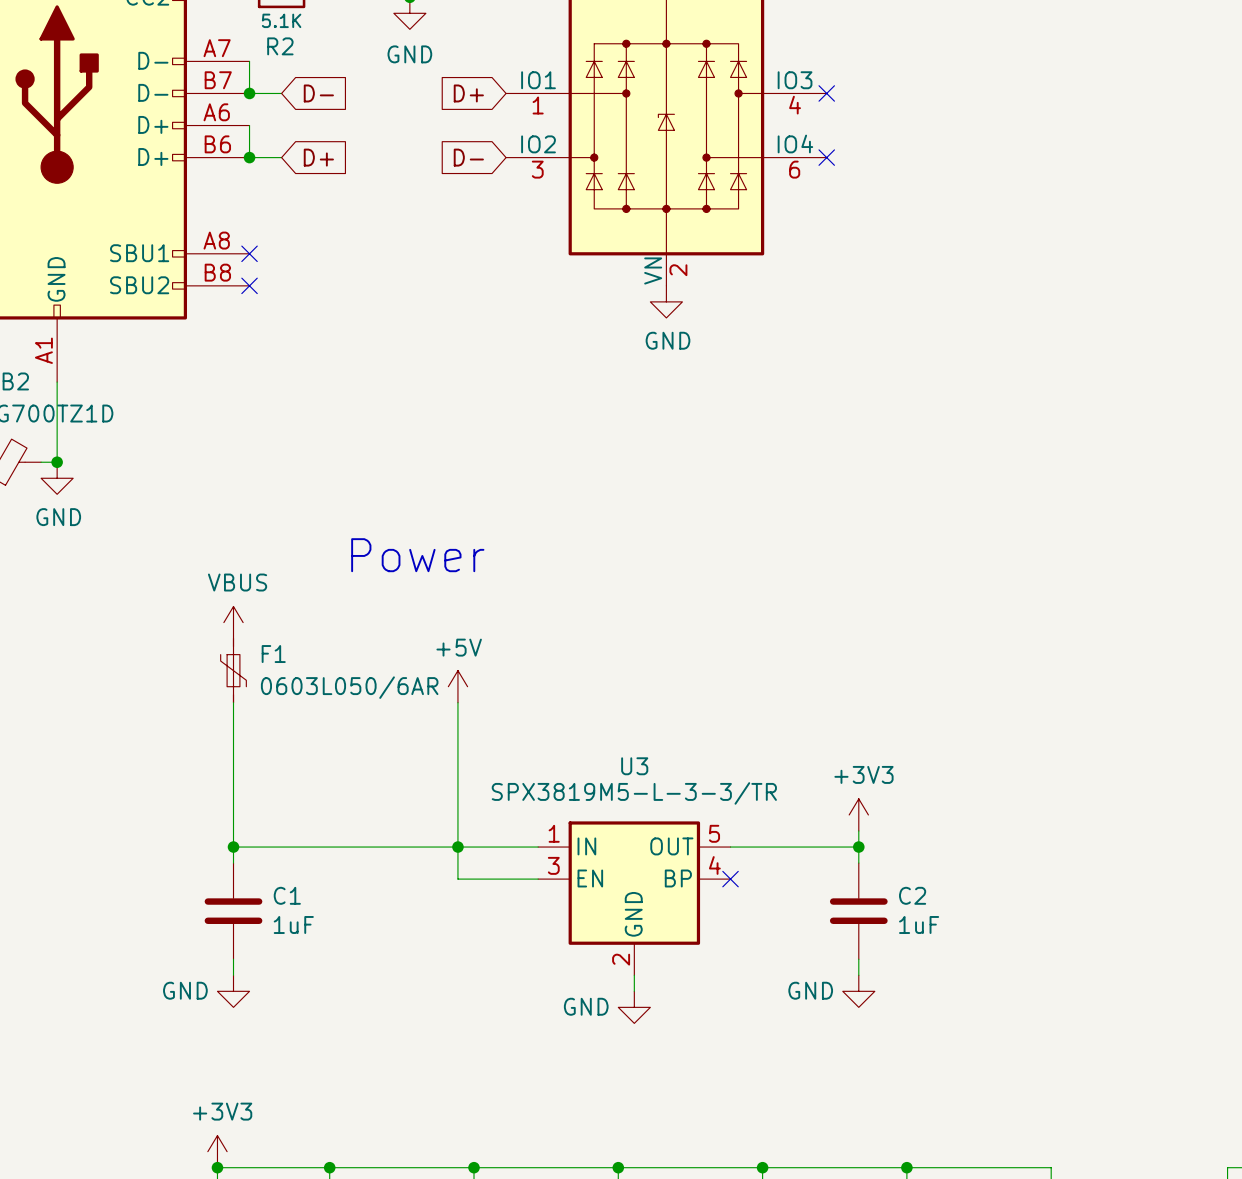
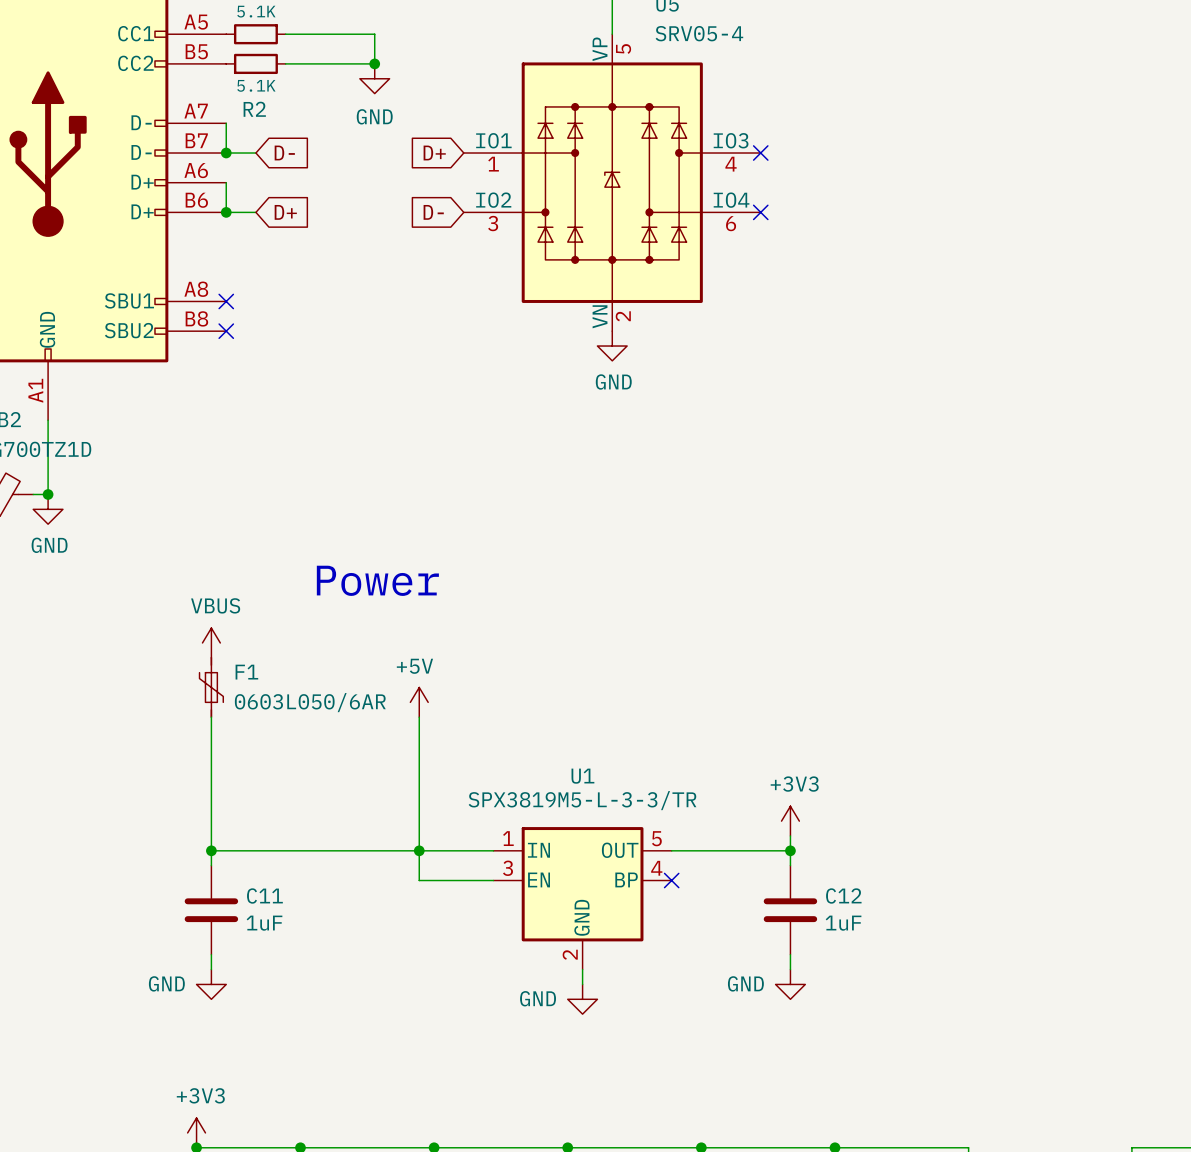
U3 name: U3 (634, 766) -> U1 (582, 776)
C1 name: C1 (287, 895) -> C11 (264, 896)
C2 name: C2 (912, 895) -> C12 (843, 896)

